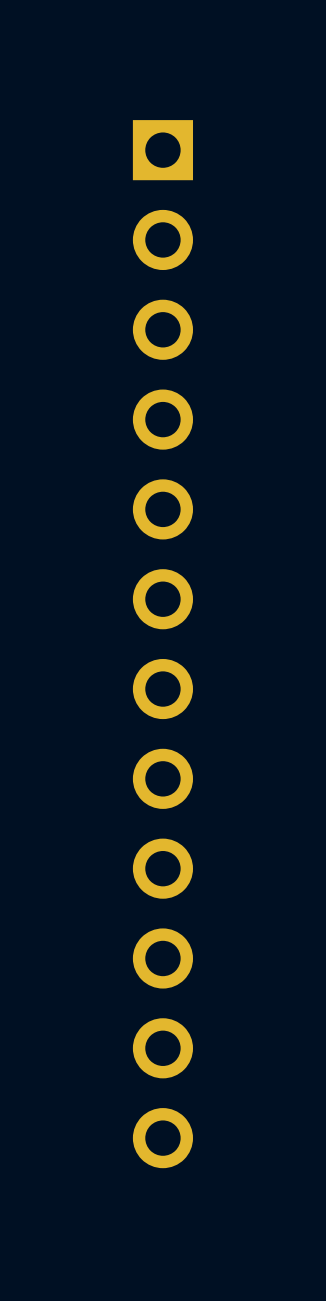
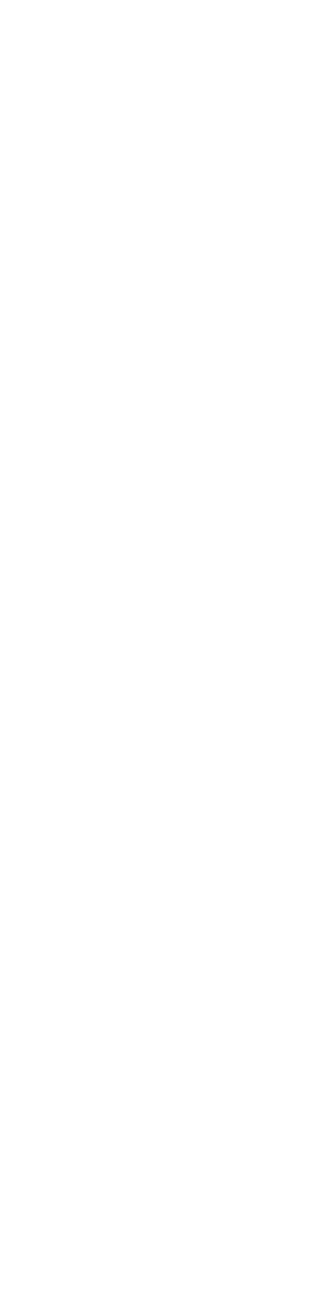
part: (162, 644) -> none

